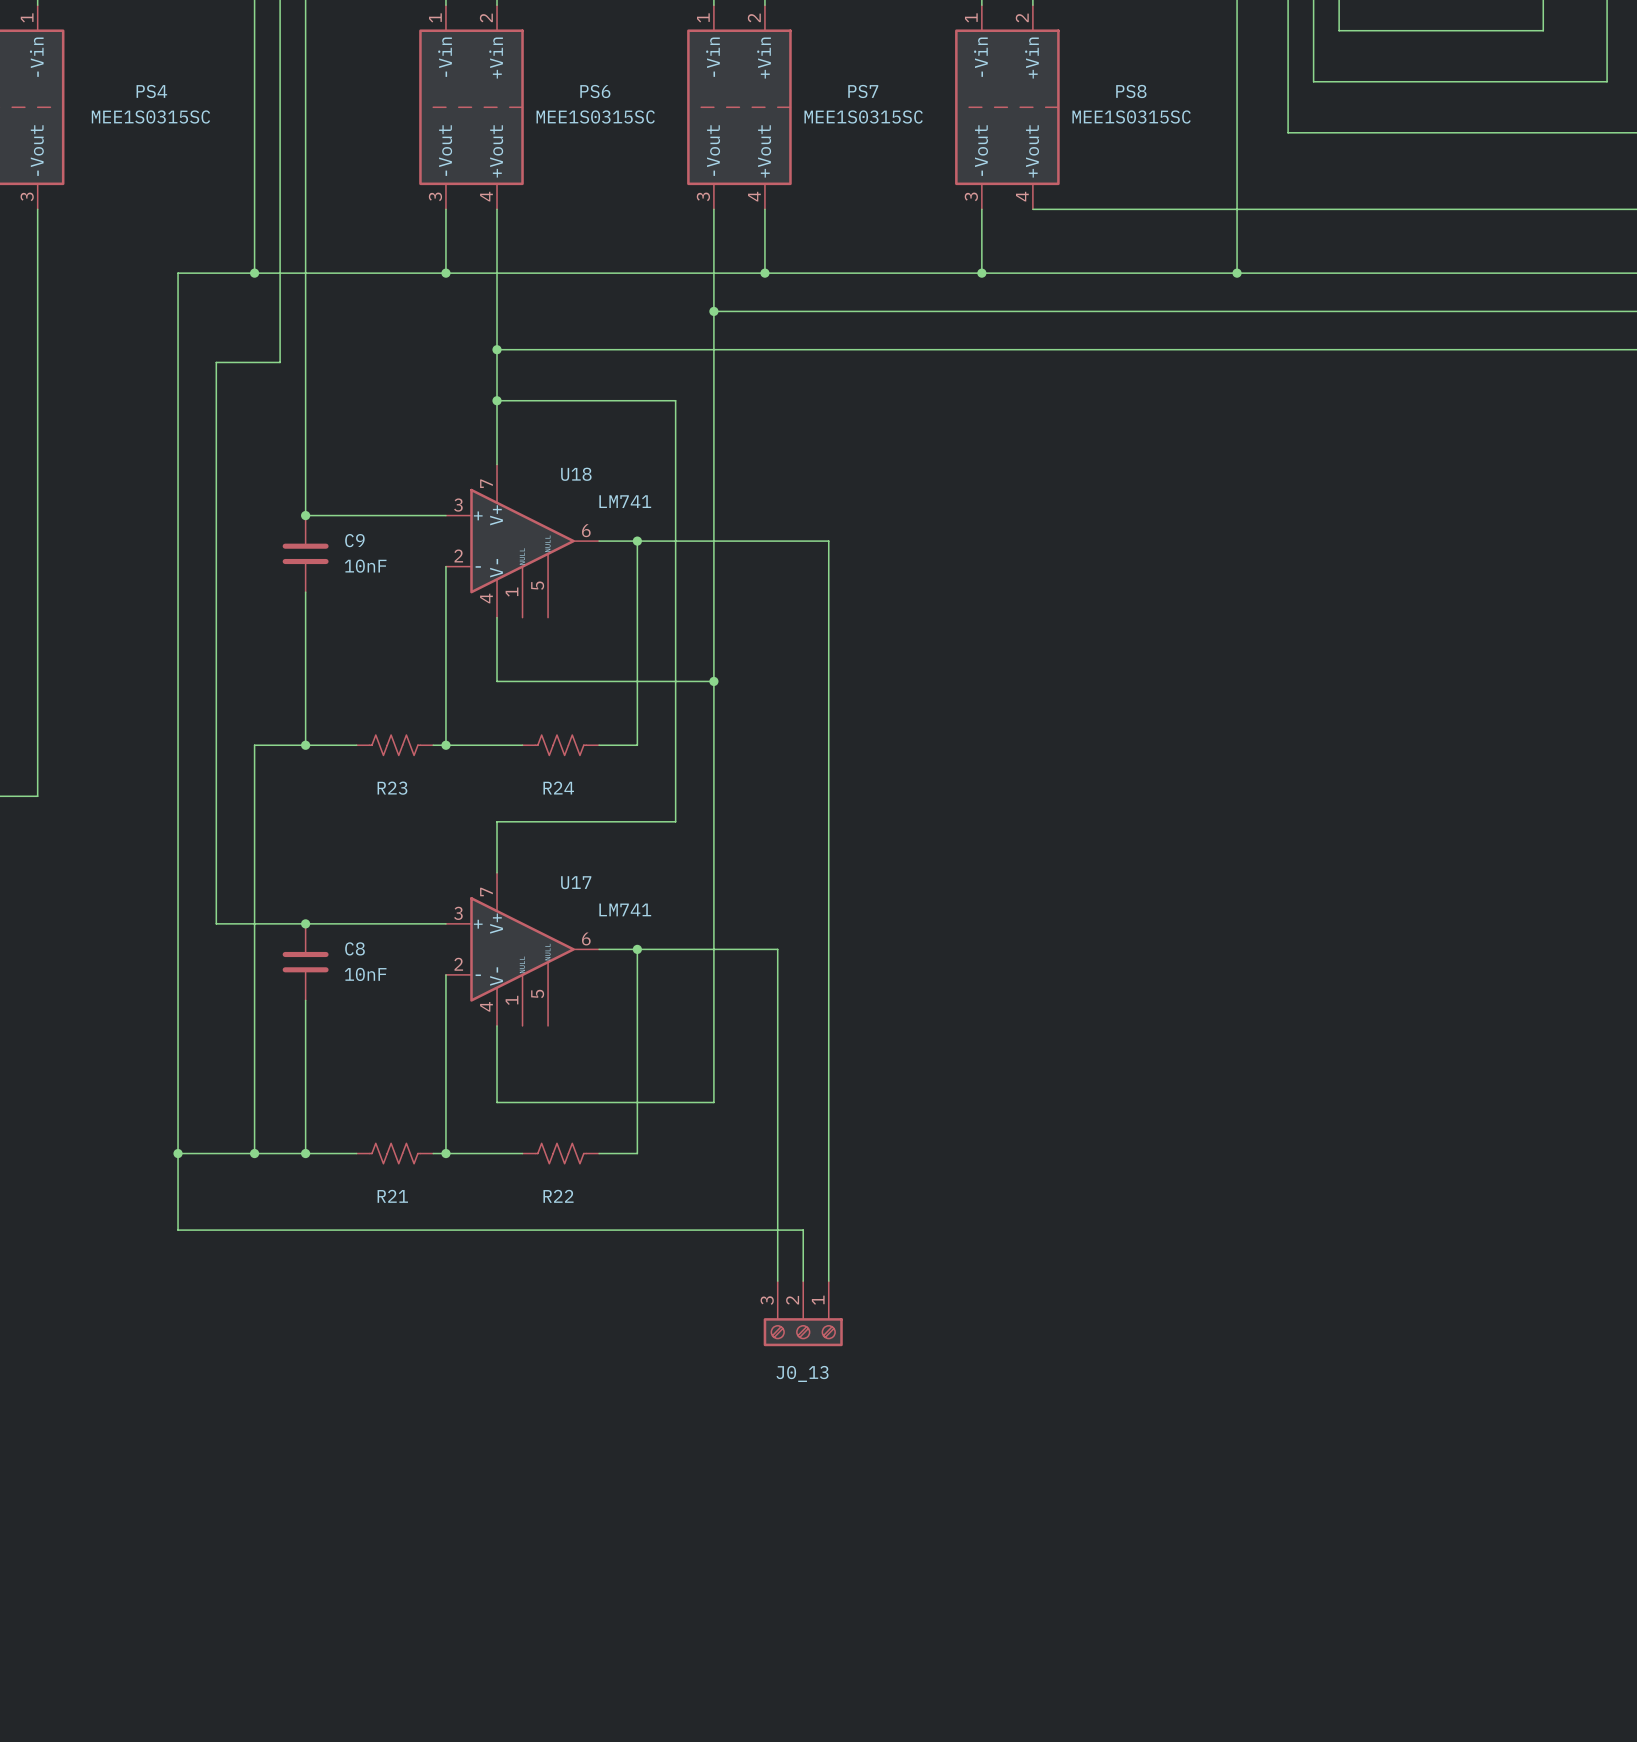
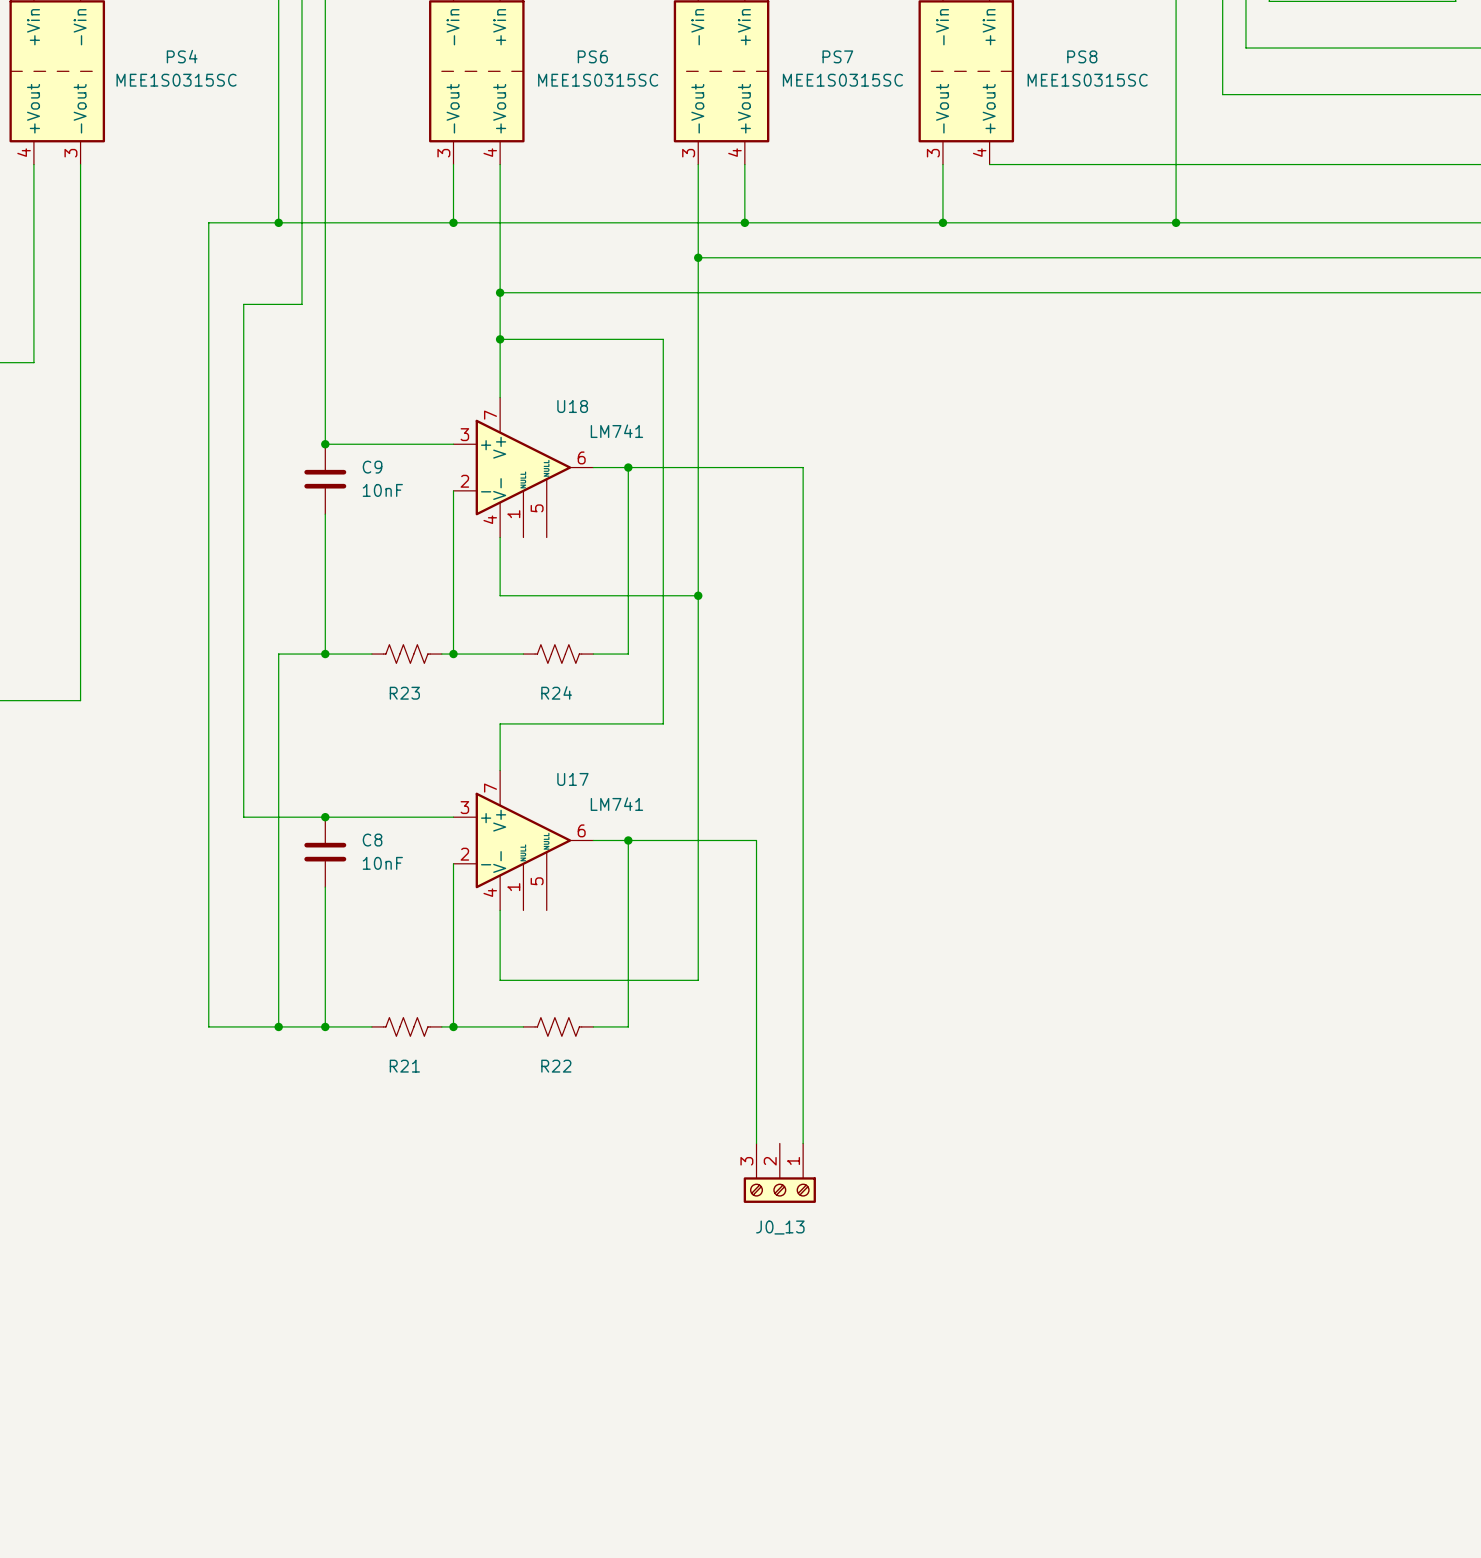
wire: (178, 1153) (178, 1230) (803, 1230) (803, 1281) -> none
junction: (178, 1153) -> none

